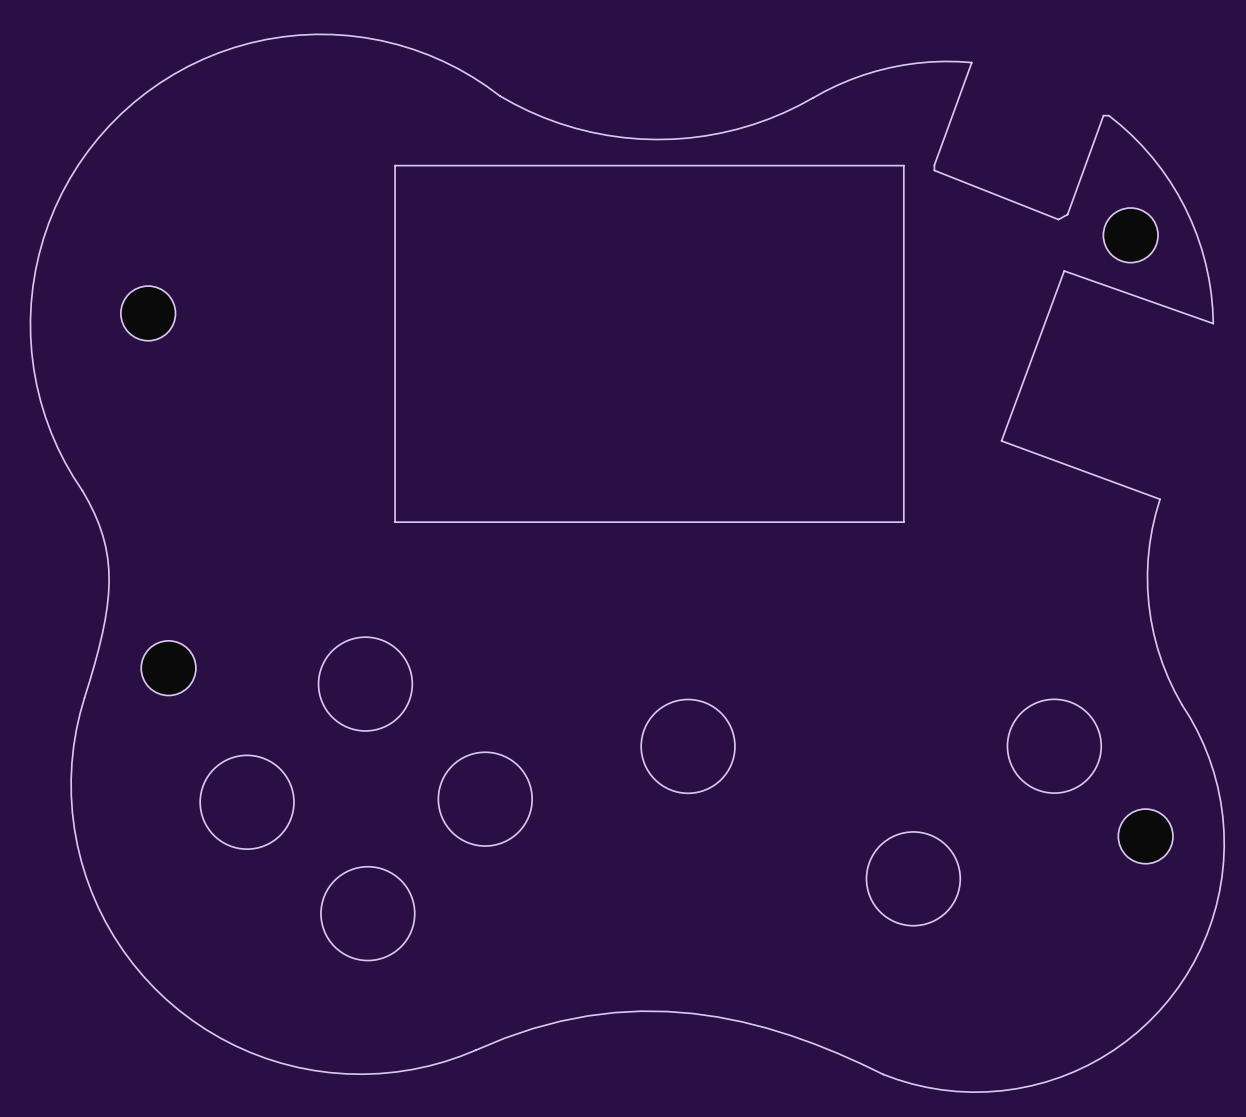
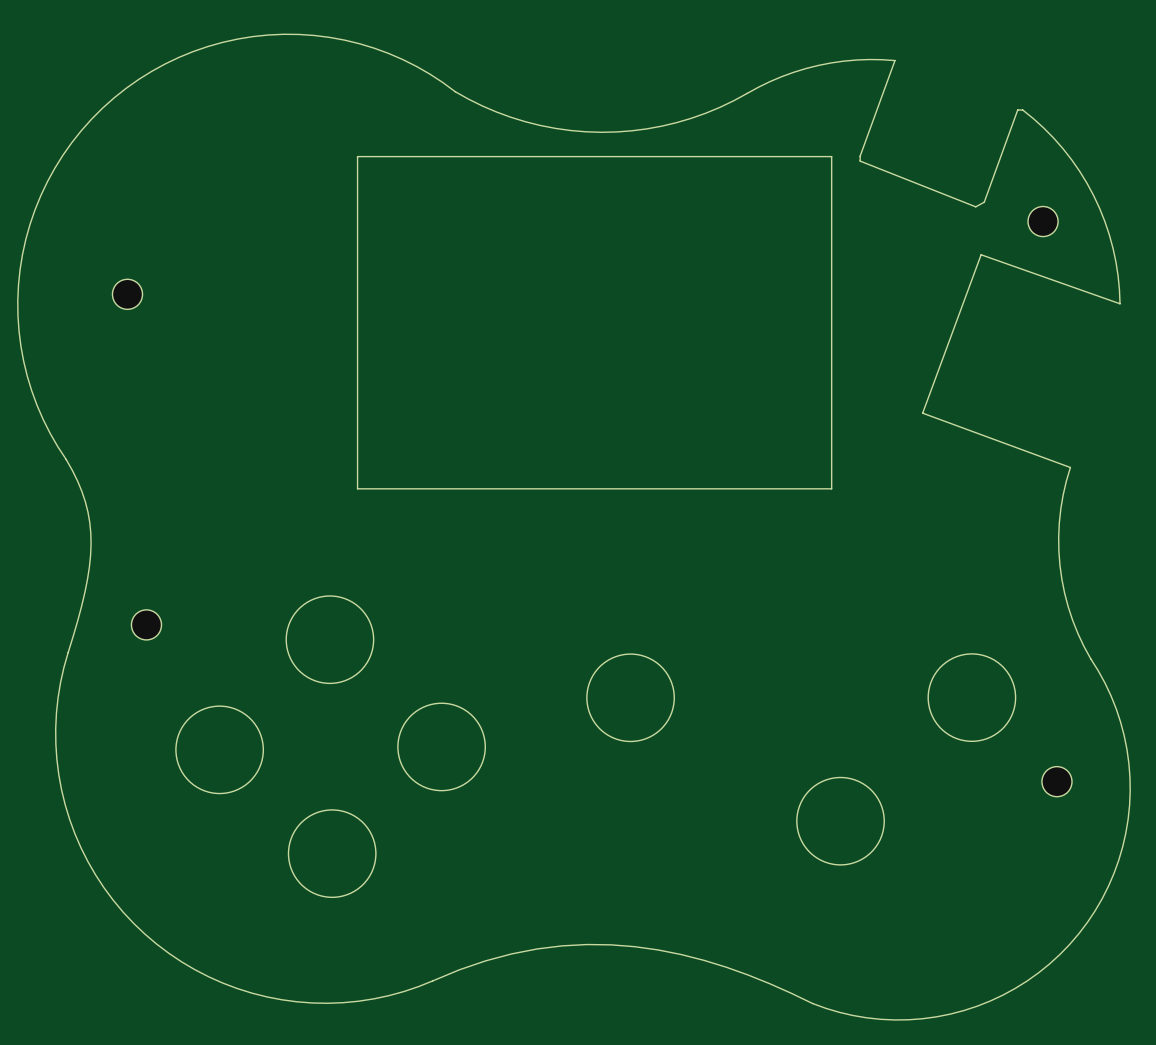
part footprint: [1103, 207, 1159, 263] -> [1028, 206, 1059, 237]
part footprint: [120, 286, 176, 341] -> [112, 279, 143, 310]
part footprint: [141, 640, 196, 696] -> [131, 609, 162, 640]
part footprint: [1118, 809, 1173, 864] -> [1041, 766, 1072, 797]

